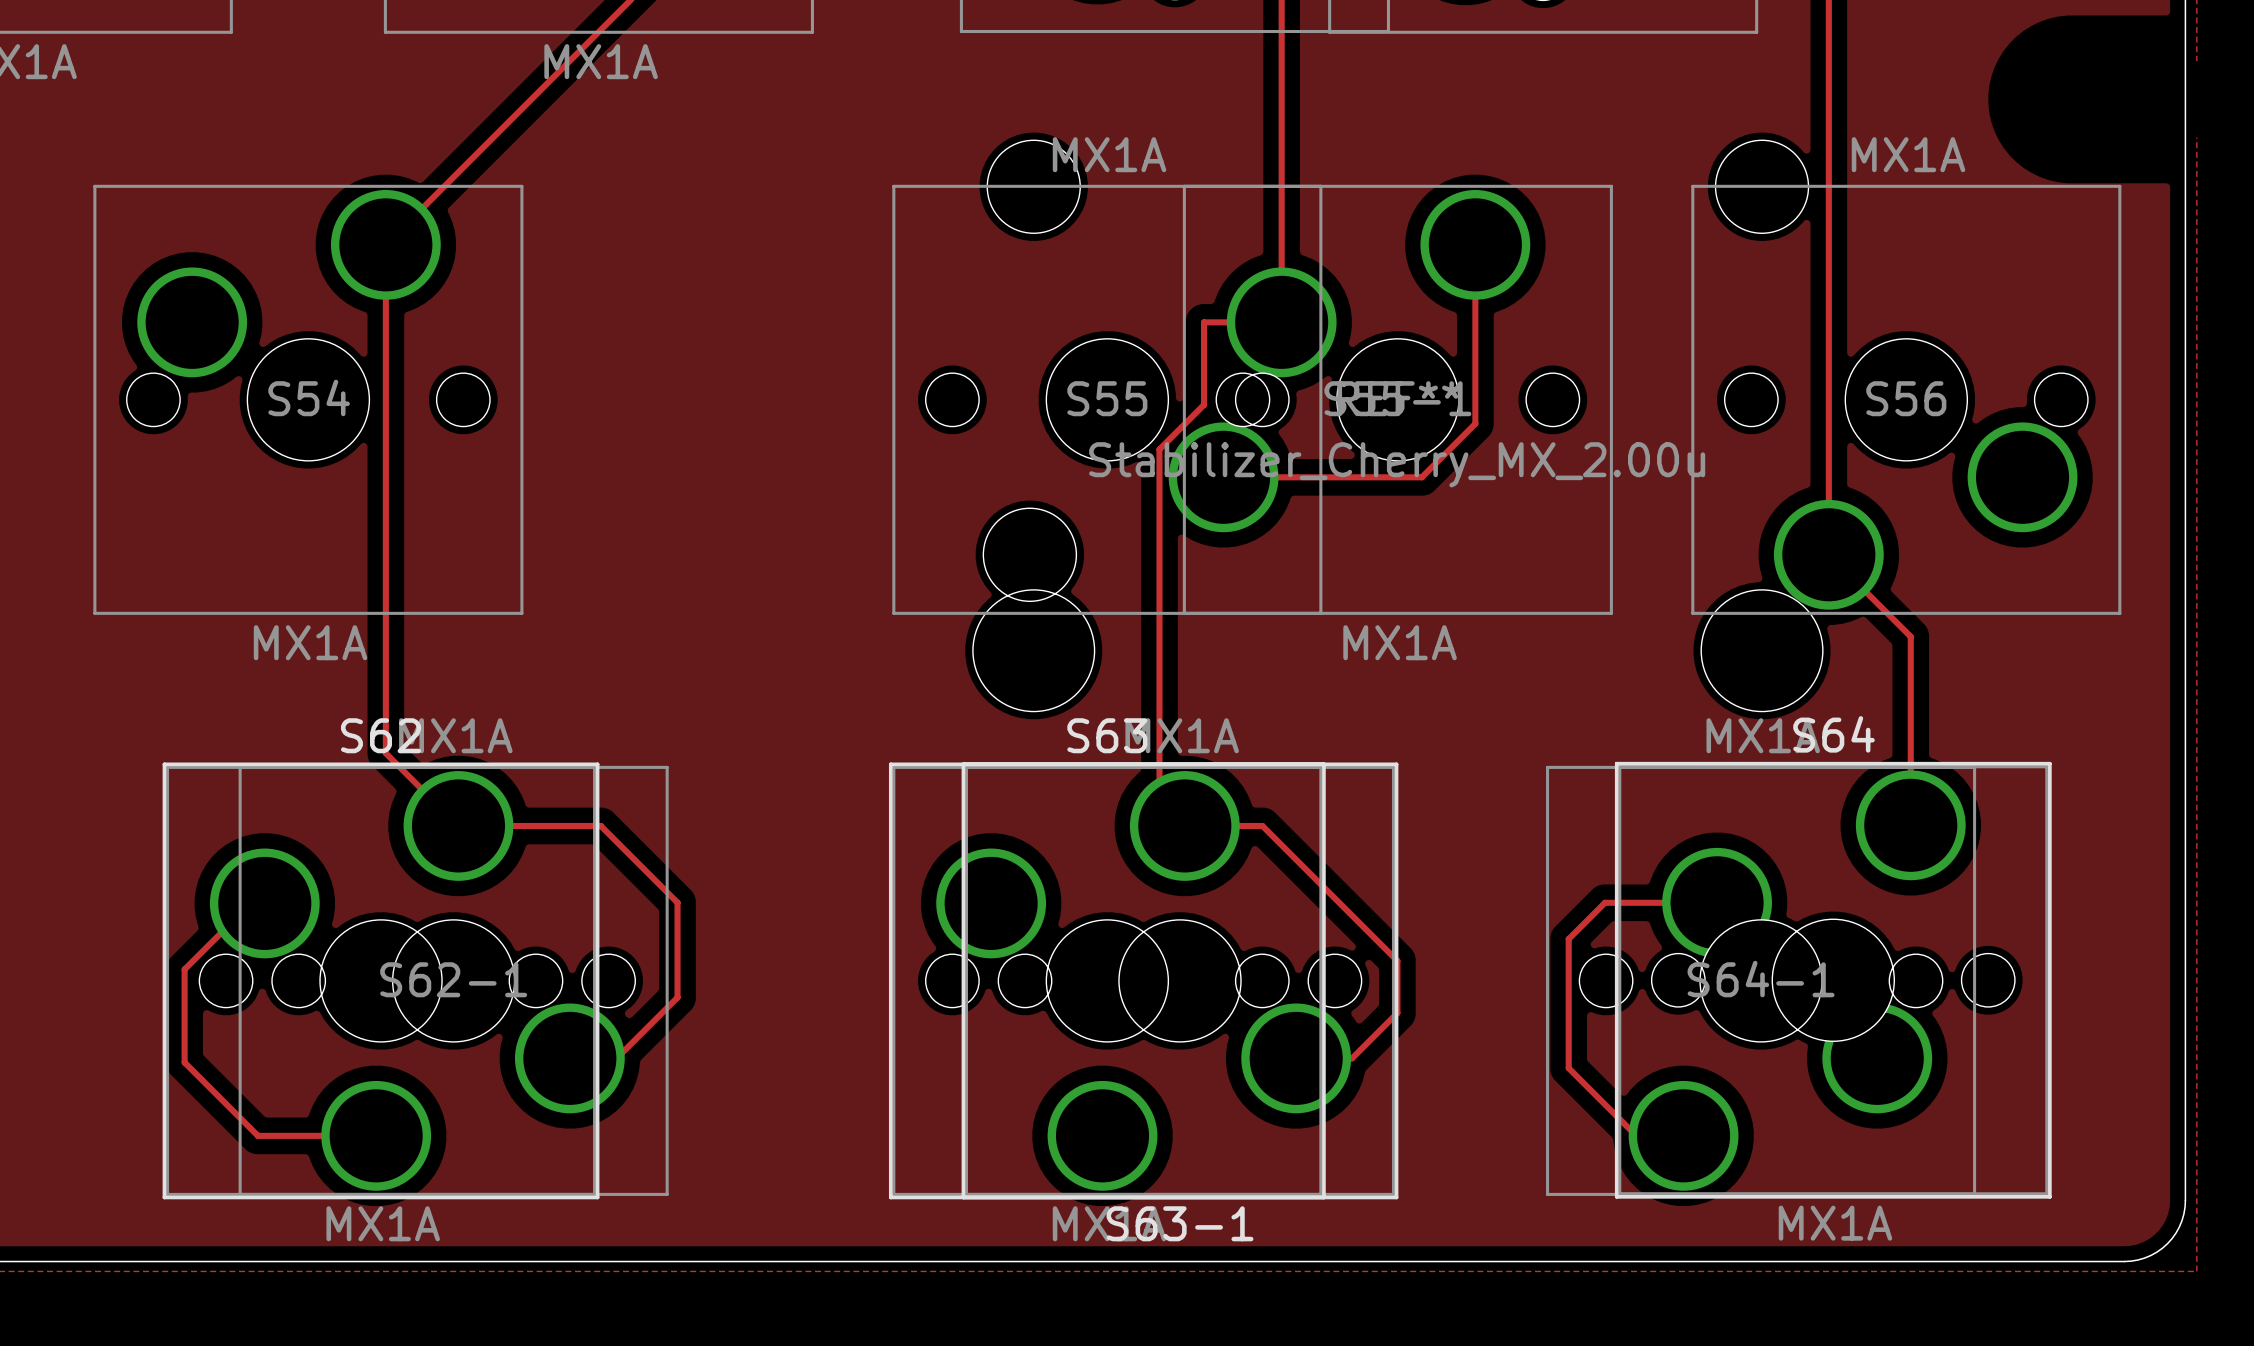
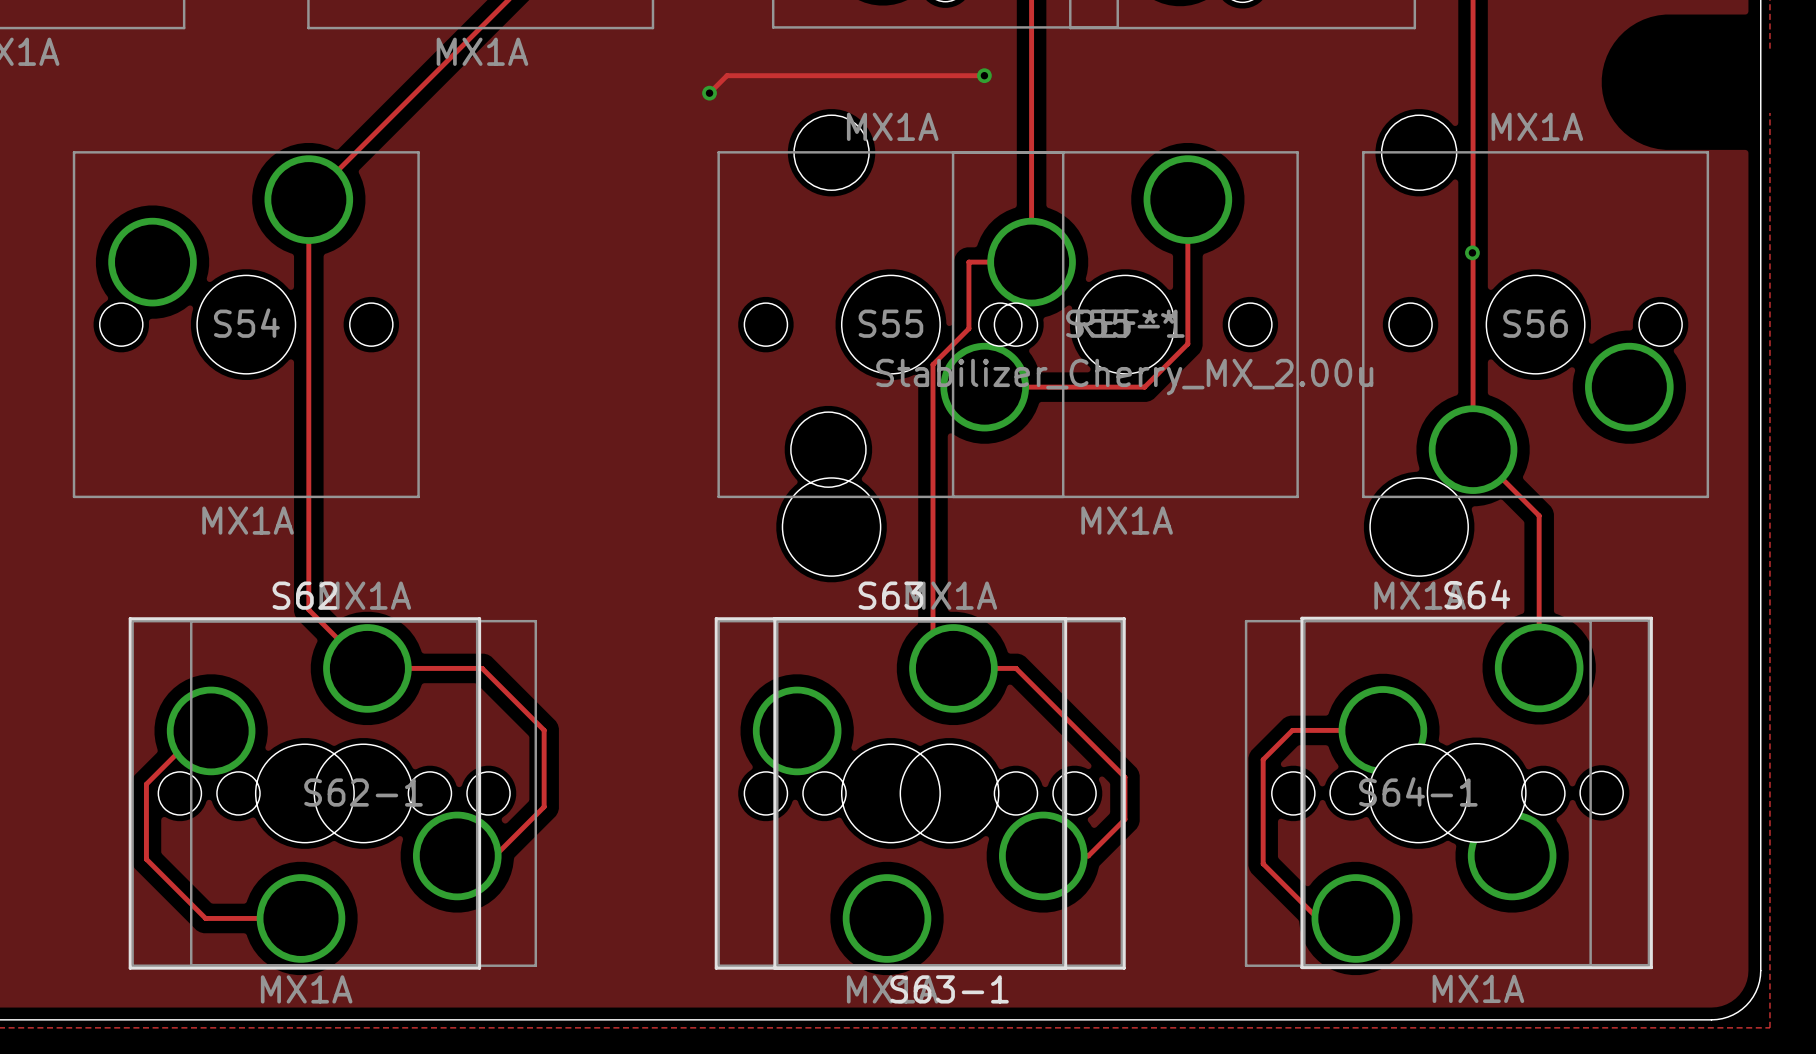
track: none -> (984, 75) (727, 75) (709, 93)
via: none -> (984, 75)
via: none -> (709, 93)
via: none -> (1472, 252)

